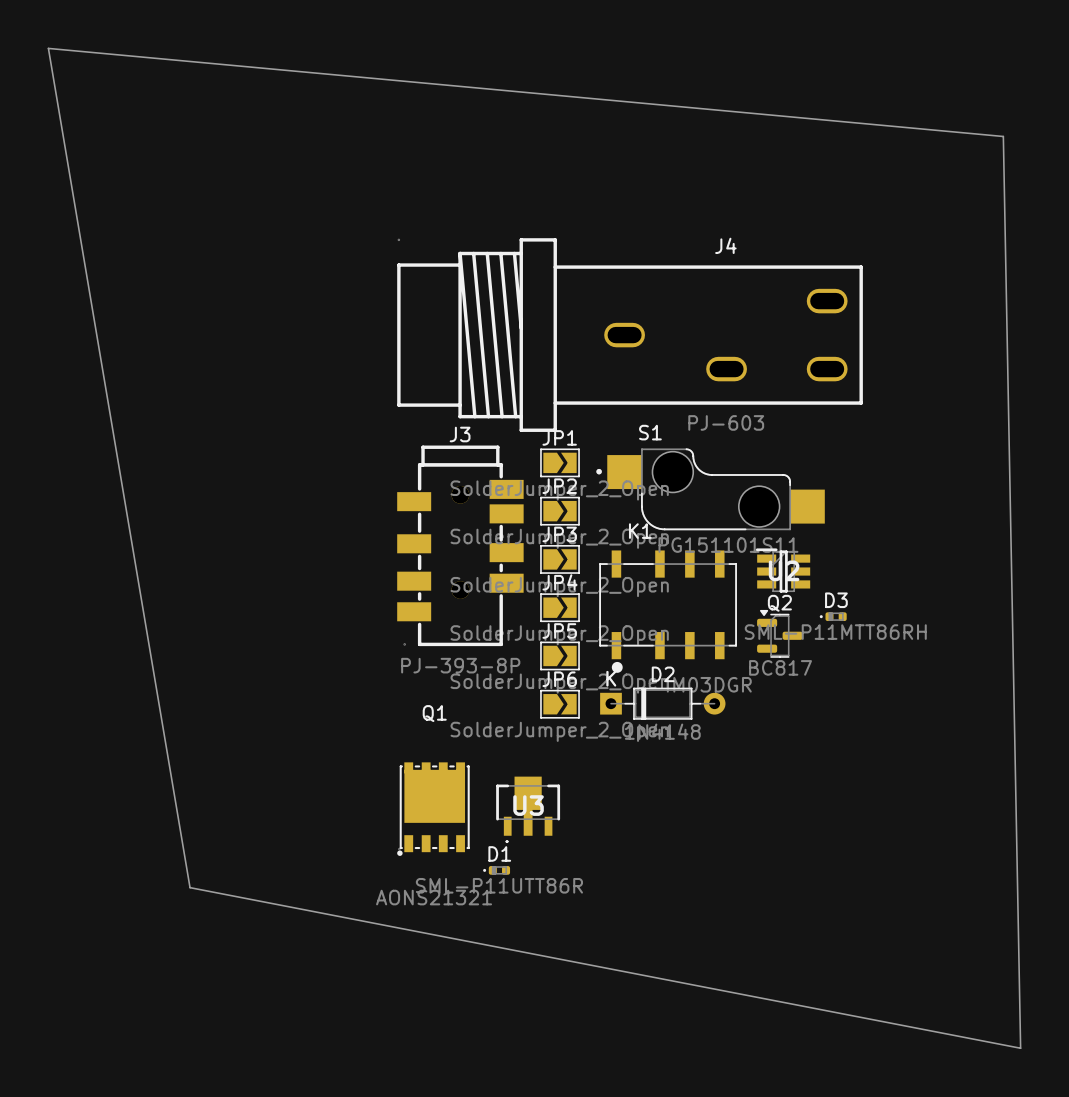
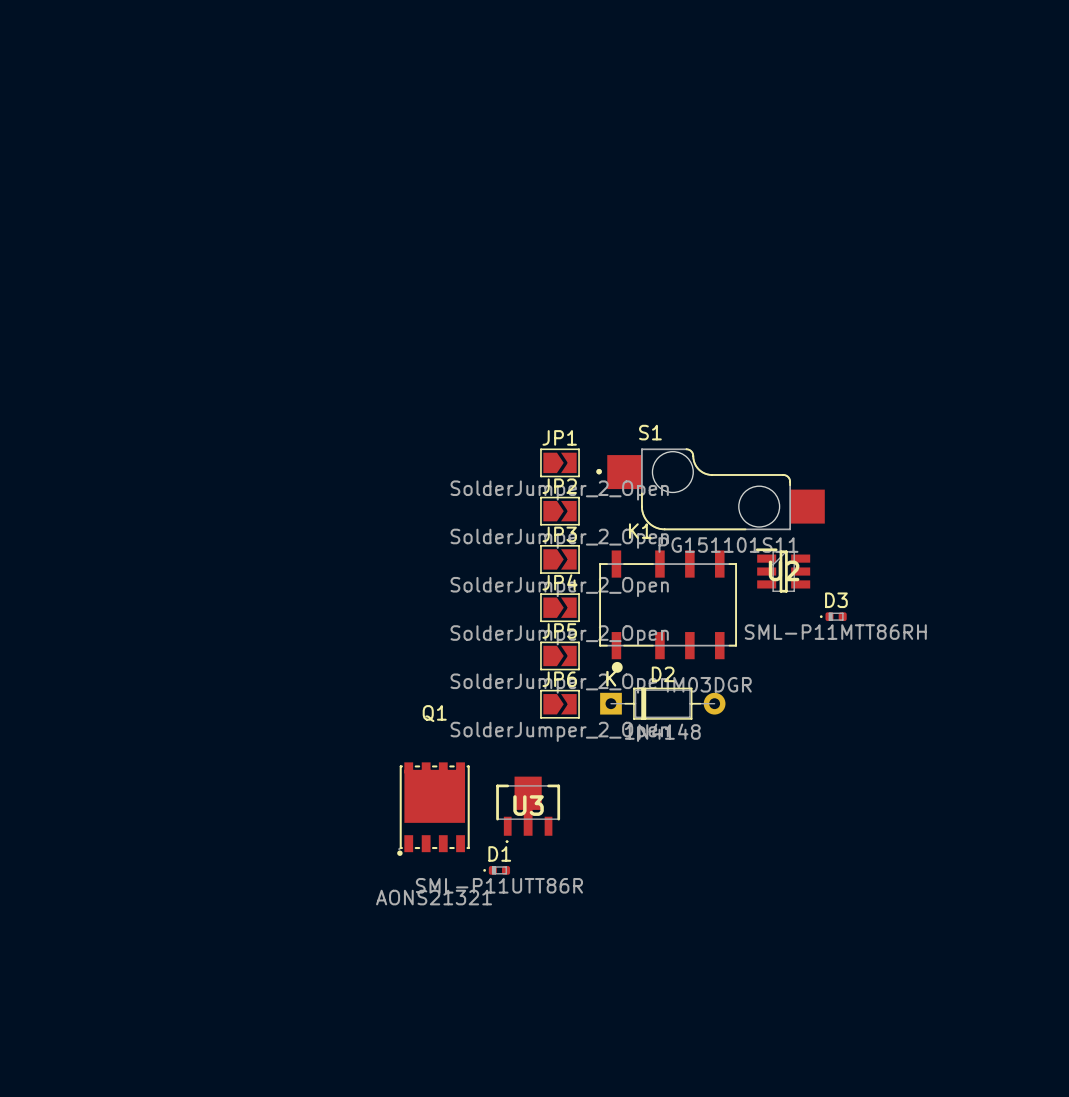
board edge: (48, 48) (1003, 136) (1020, 1048) (190, 887) (48, 48) -> none
J4: PJ-603 (630, 335) -> none
J3: PJ-393-8P (460, 545) -> none
Q2: BC817 (779, 633) -> none

